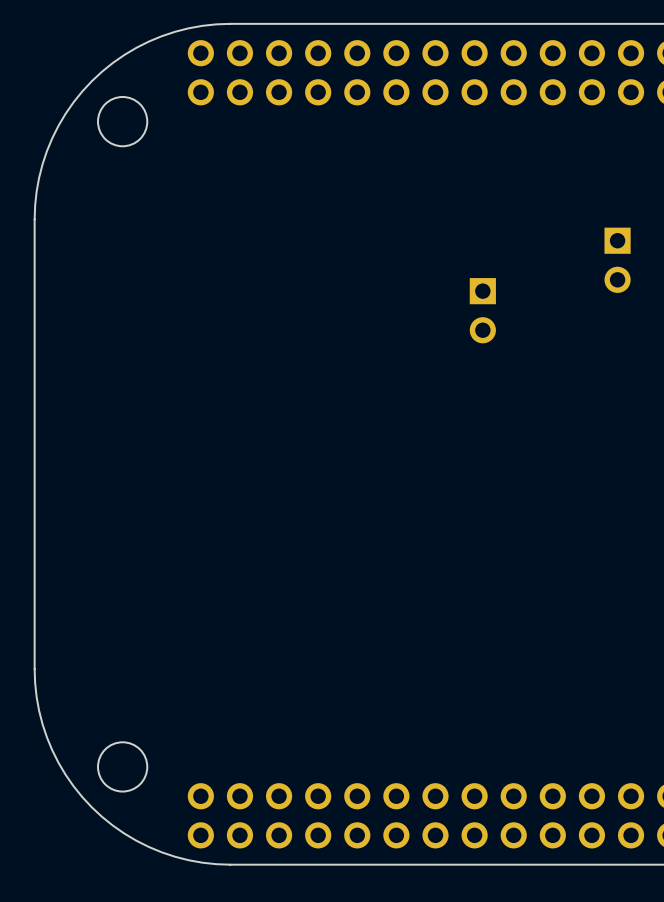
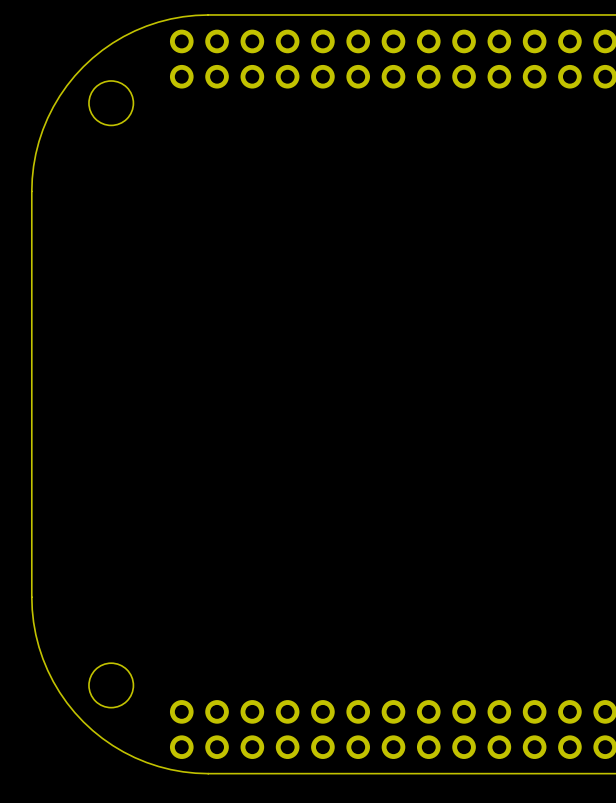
part: (617, 260) -> none
part: (482, 310) -> none

